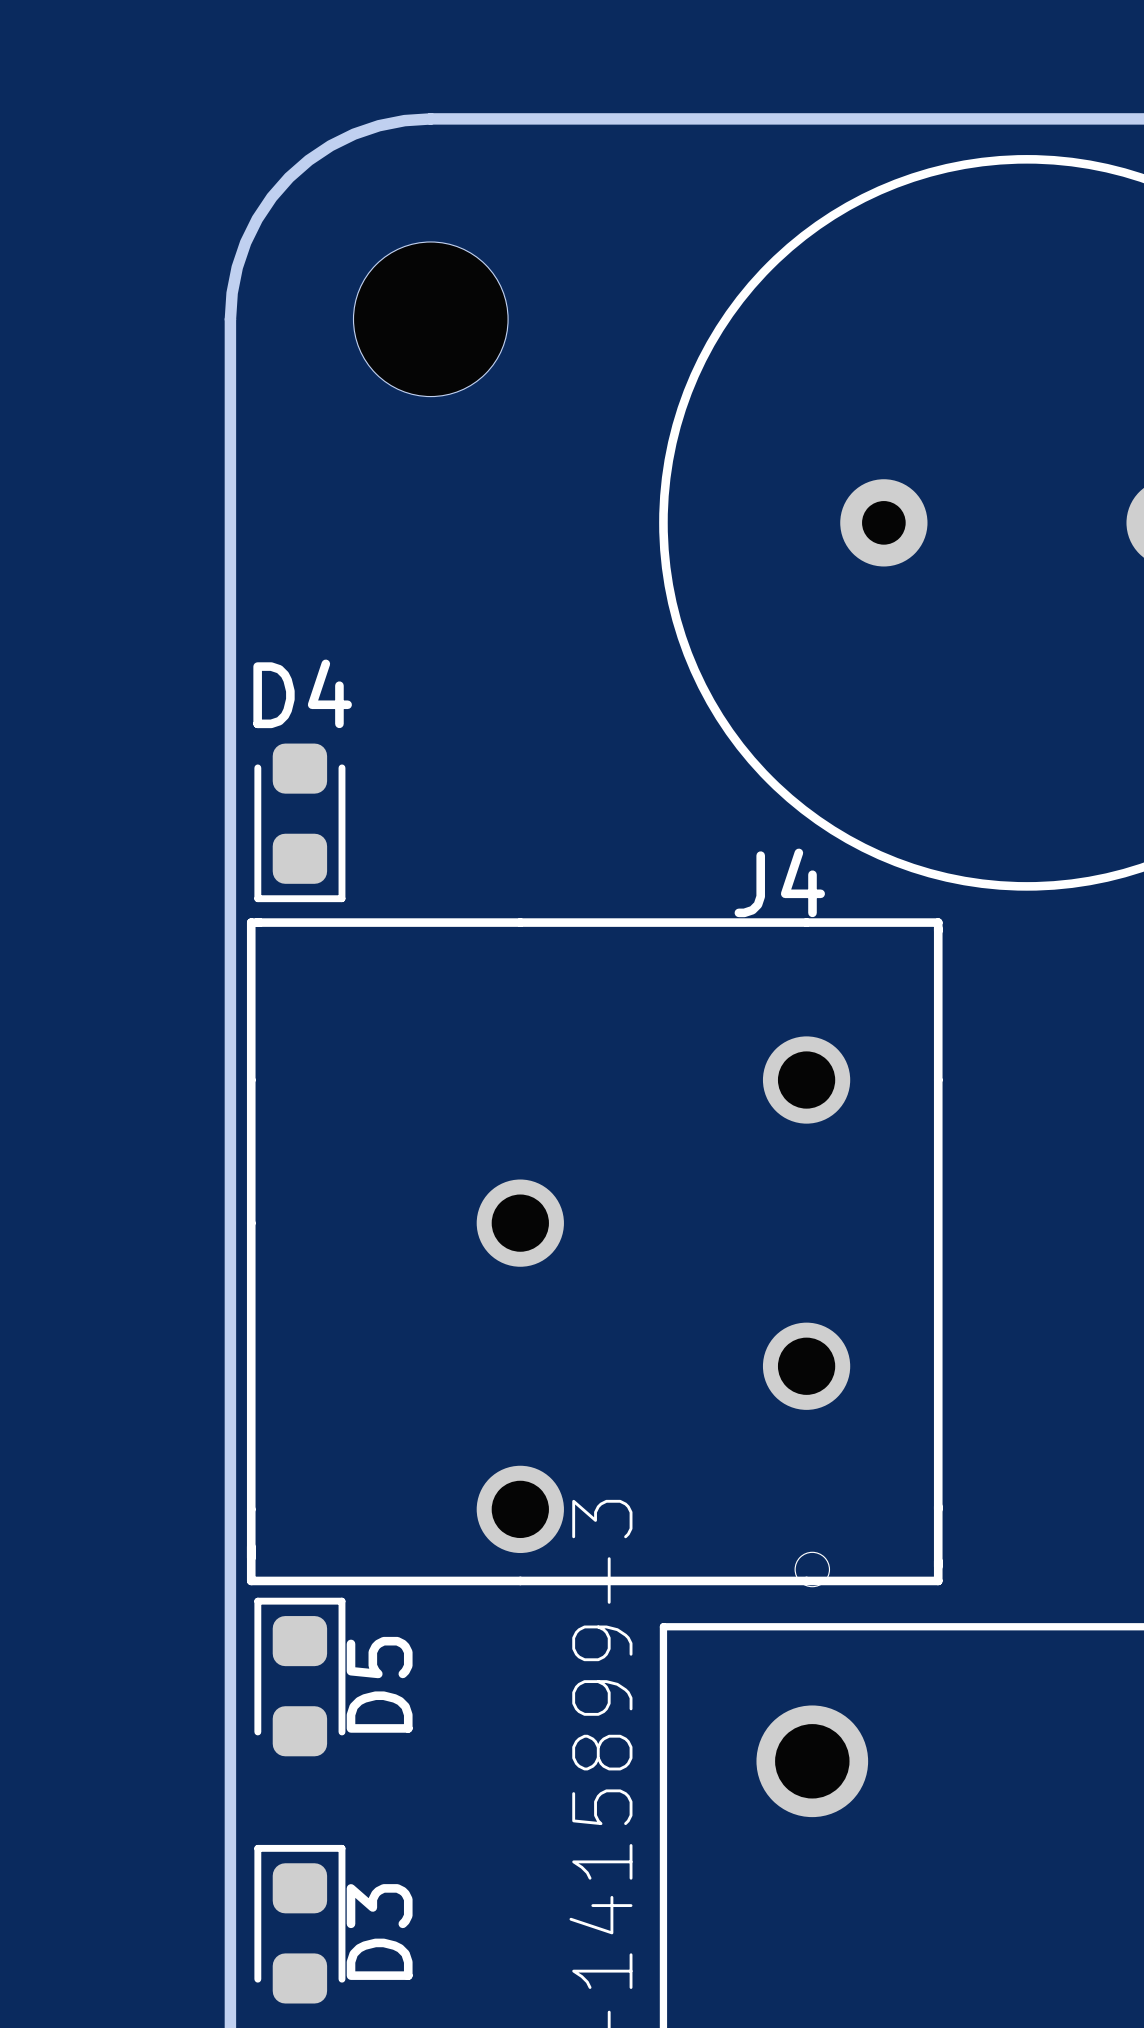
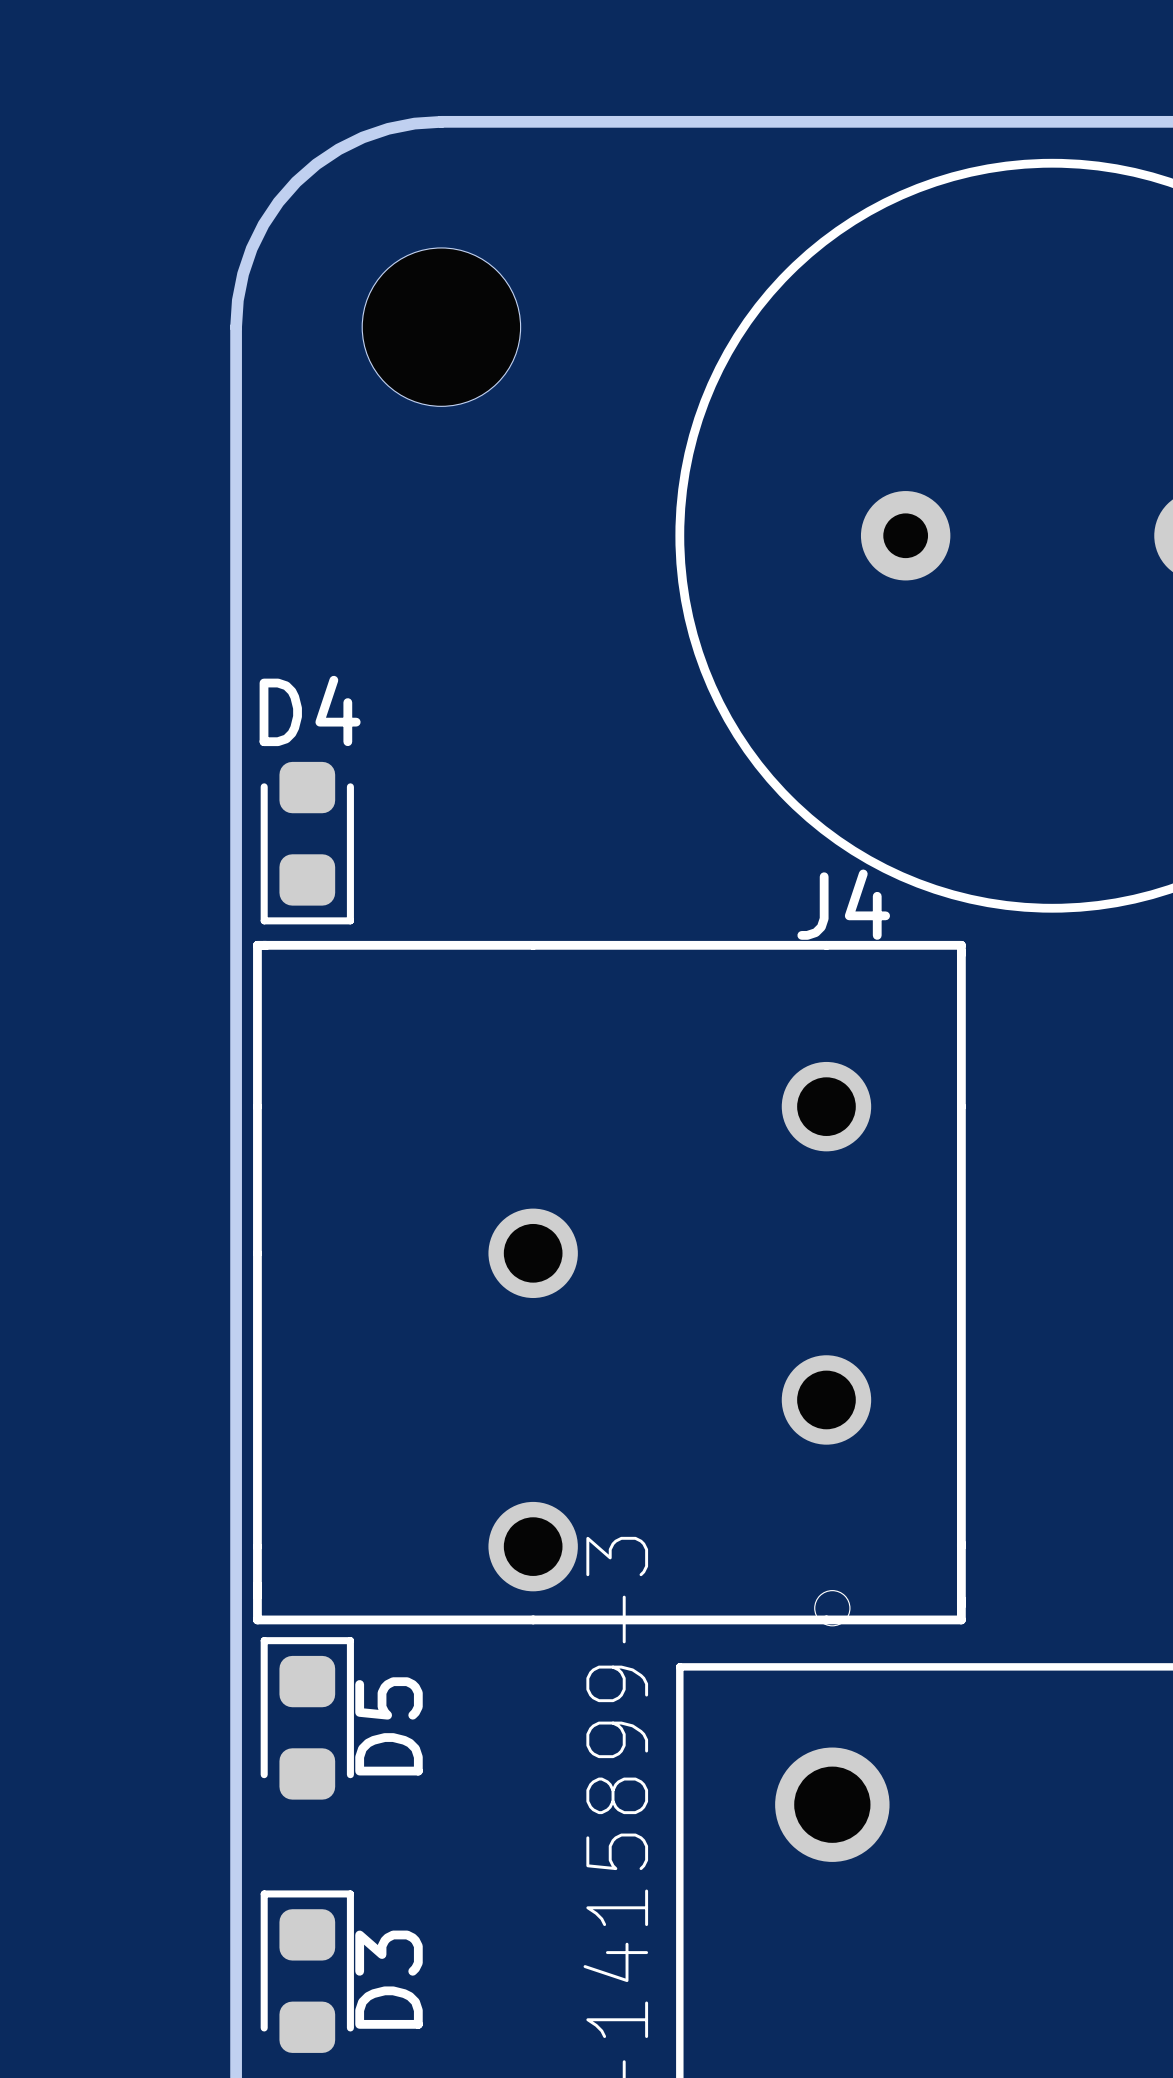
J4 name position: J4 (779, 882) -> J4 (843, 904)

